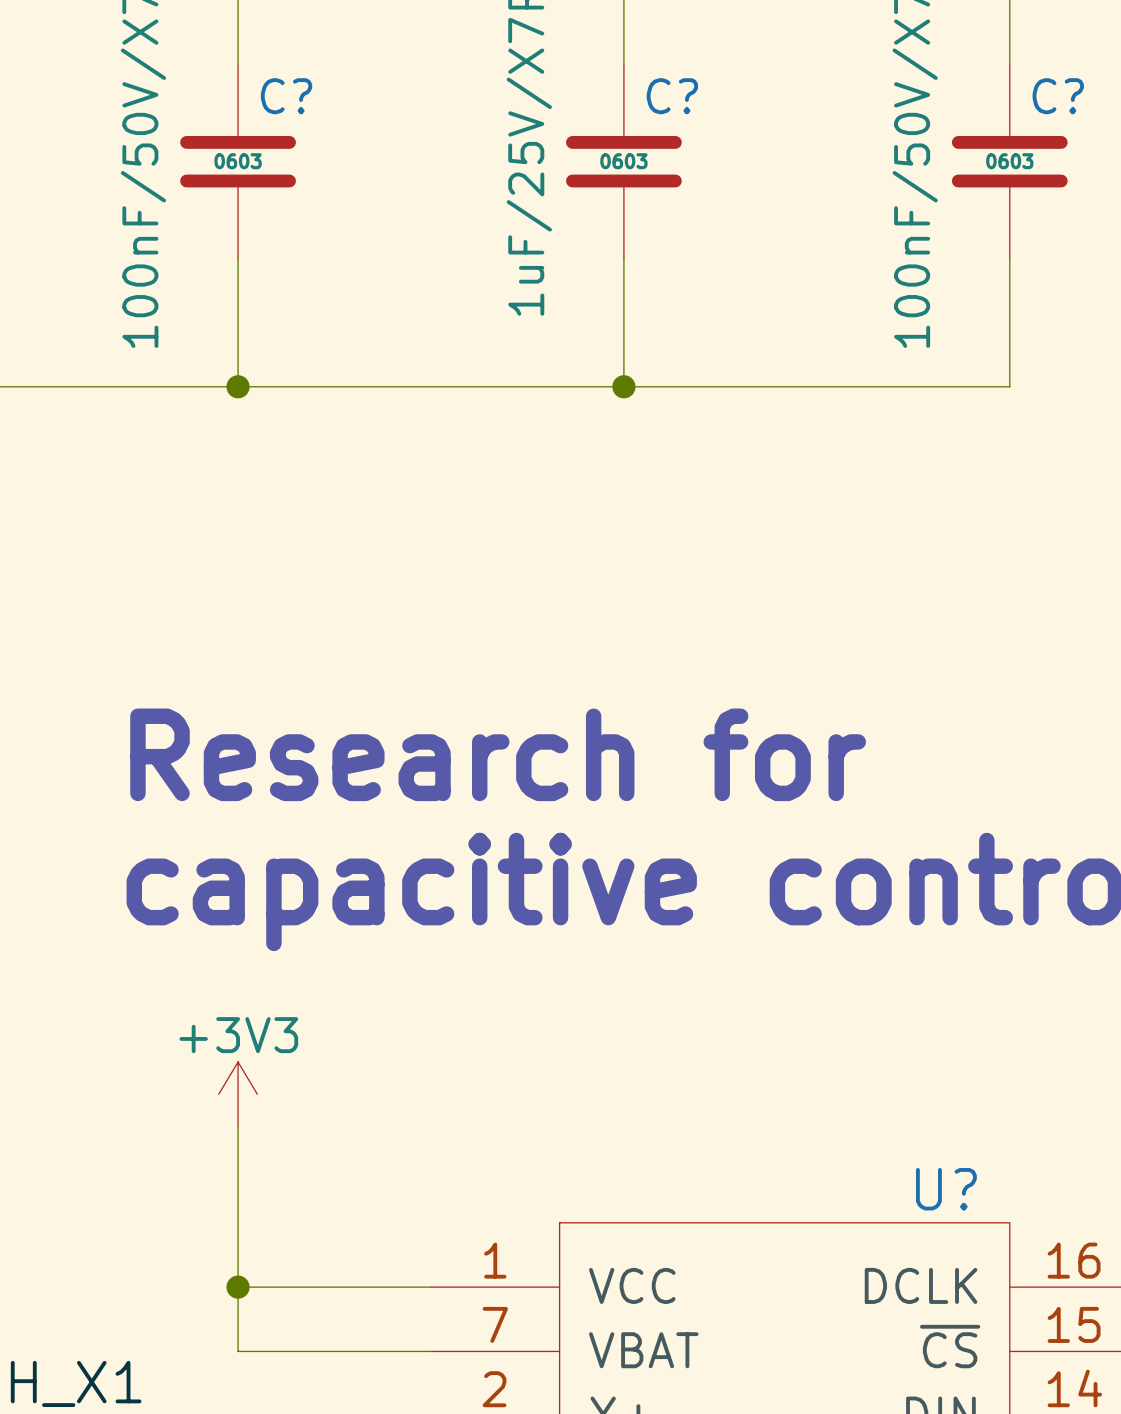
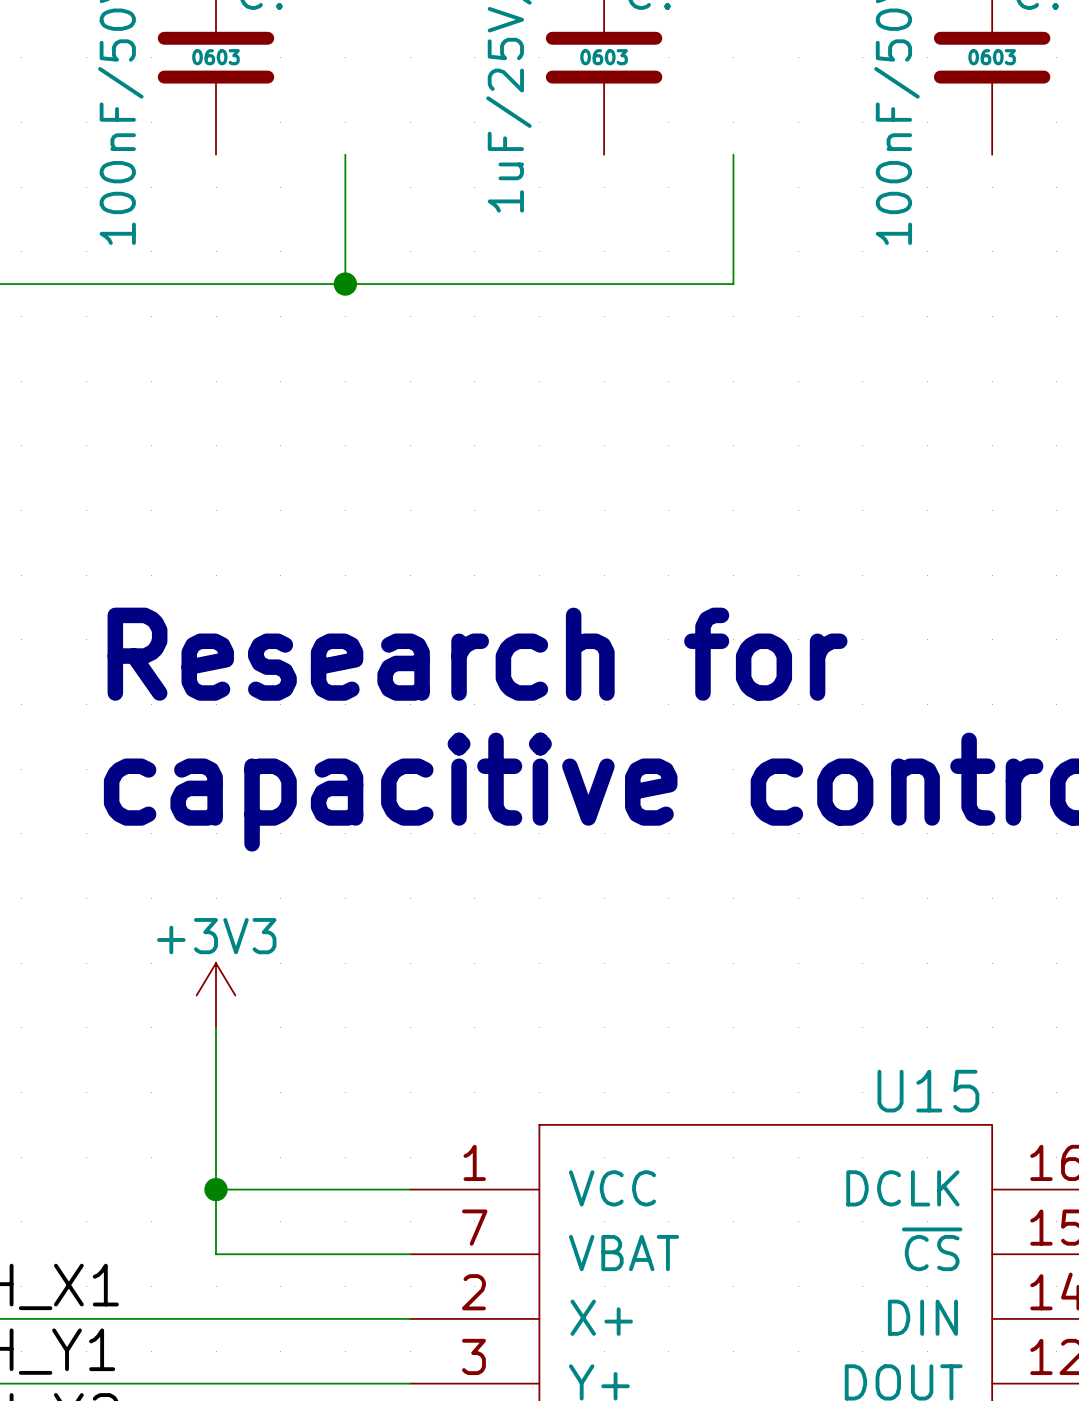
wire: (238, 258) (238, 386) -> (345, 154) (345, 284)
wire: (623, 258) (623, 386) -> none
wire: (1009, 258) (1009, 386) (752, 386) -> (733, 154) (733, 284)
junction: (238, 386) -> none
junction: none -> (345, 284)
junction: (623, 386) -> none
U? name: U? (946, 1189) -> U15 (928, 1091)

